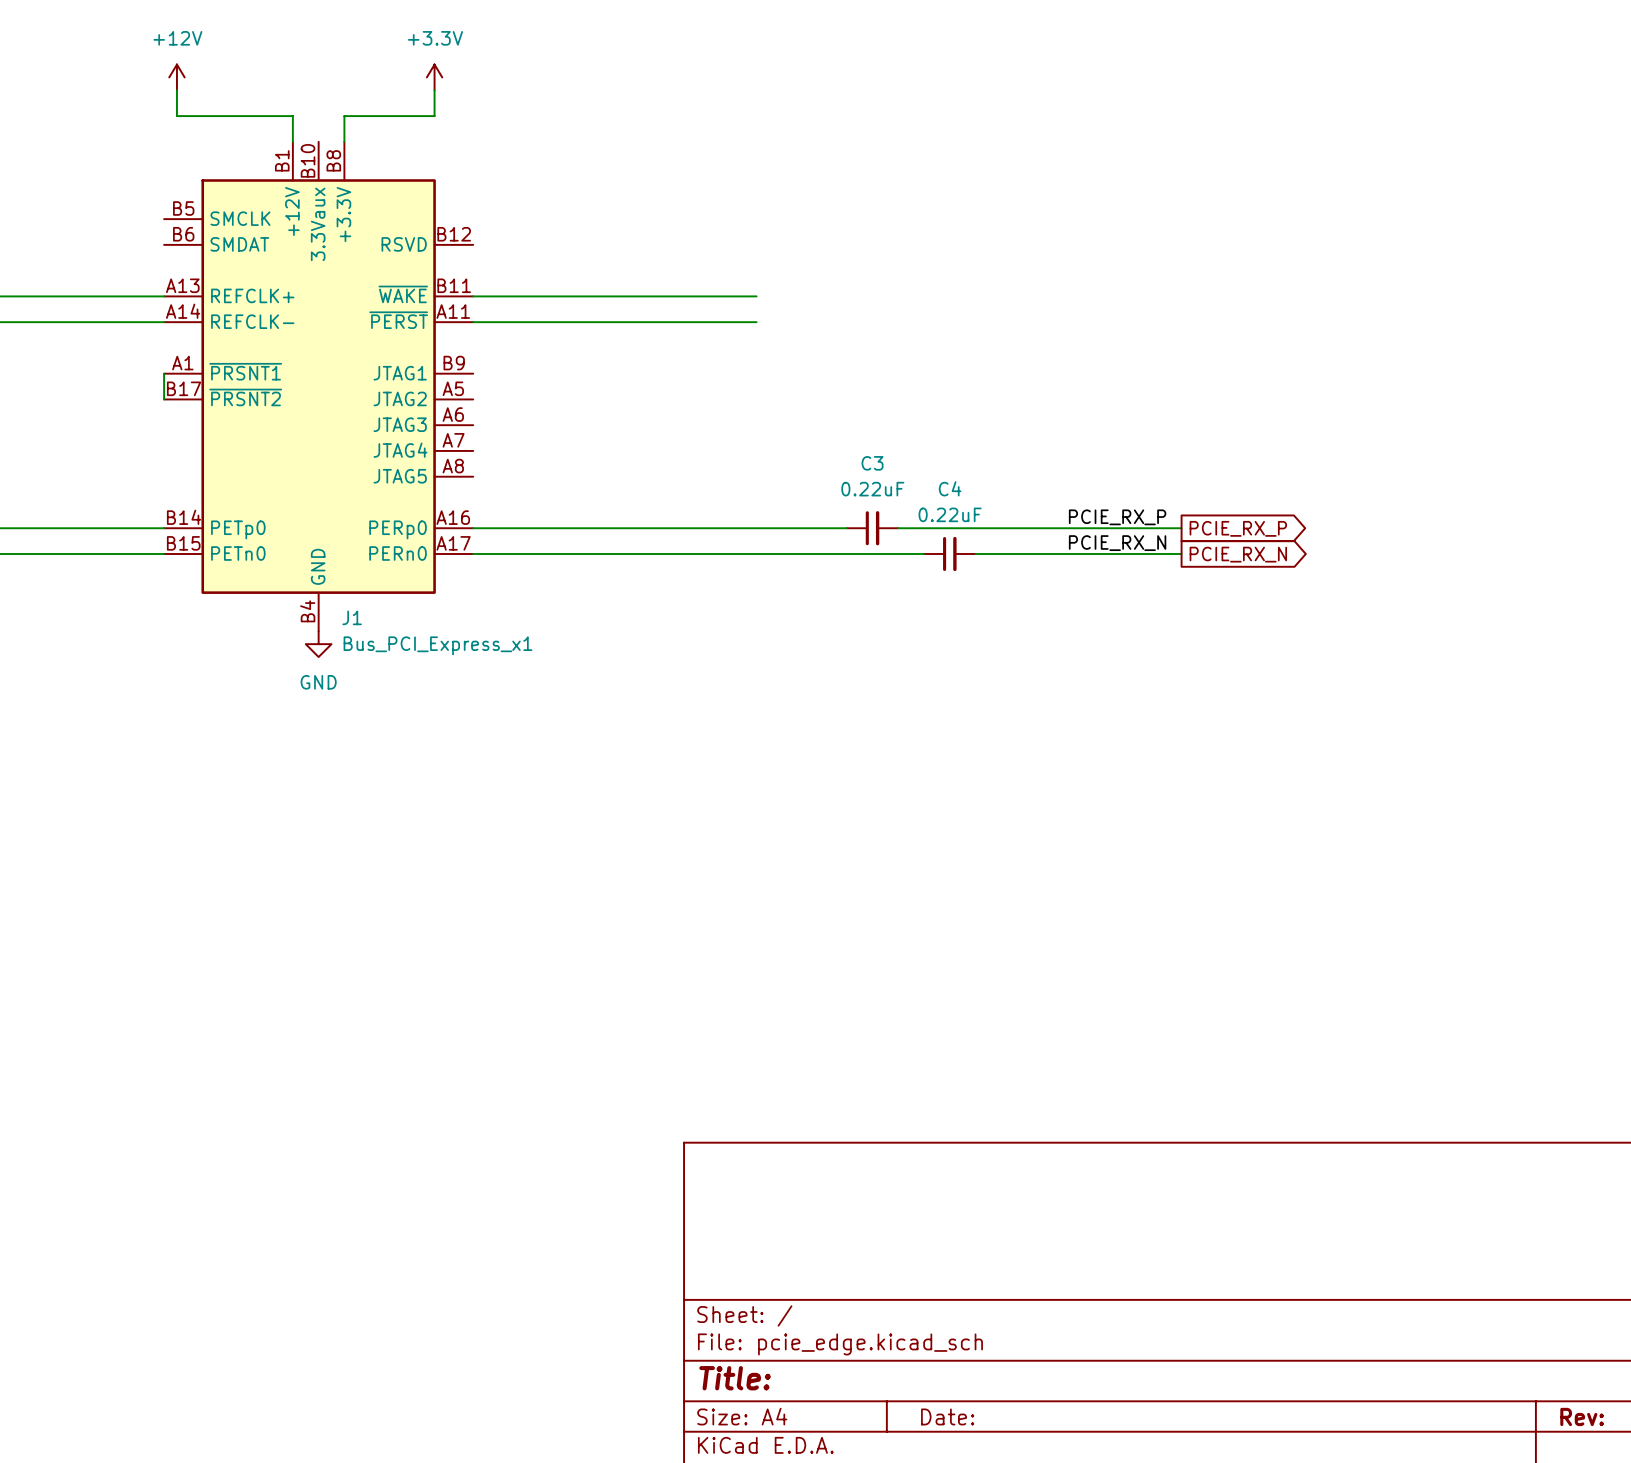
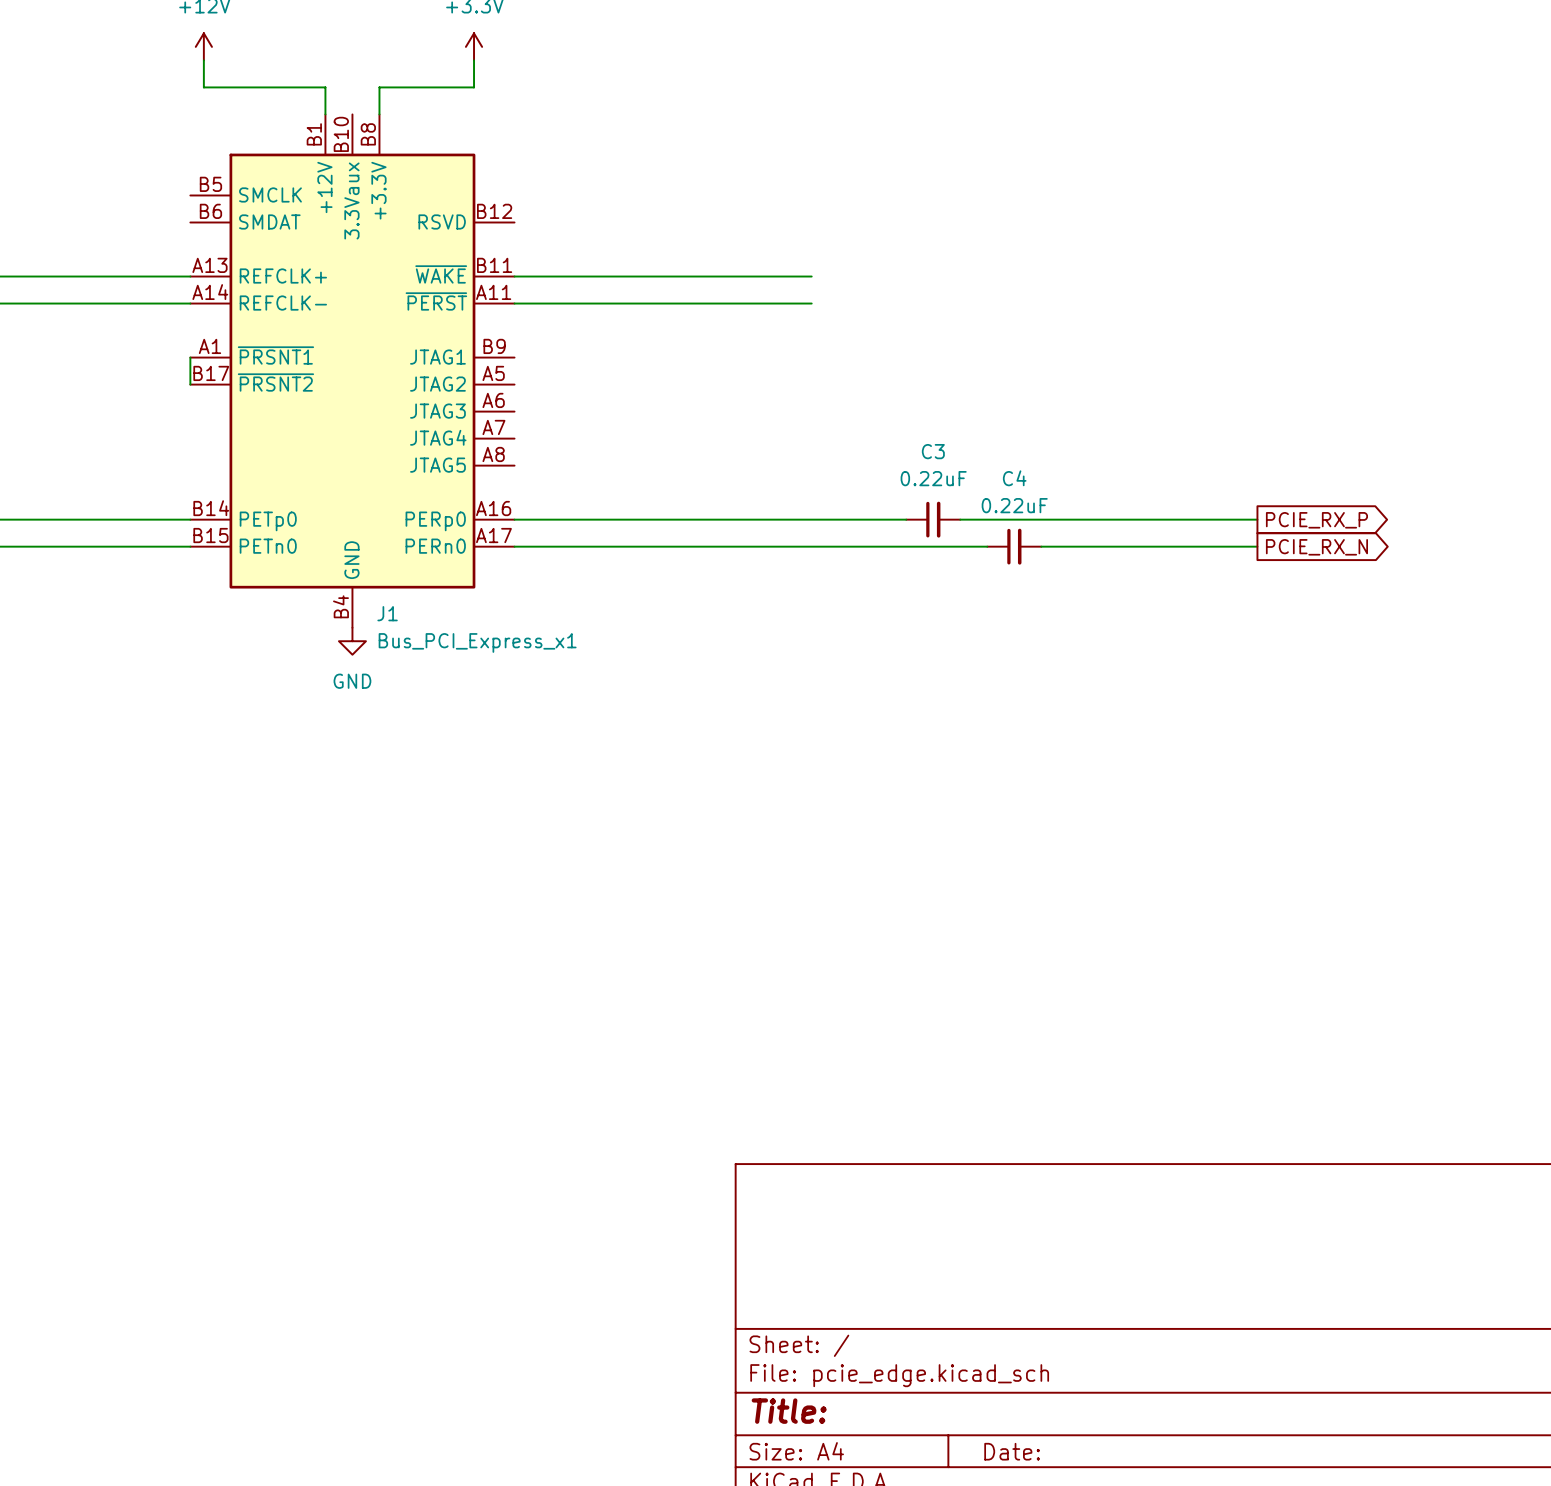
label: PCIE_RX_P (1117, 517) -> none
label: PCIE_RX_N (1117, 543) -> none

